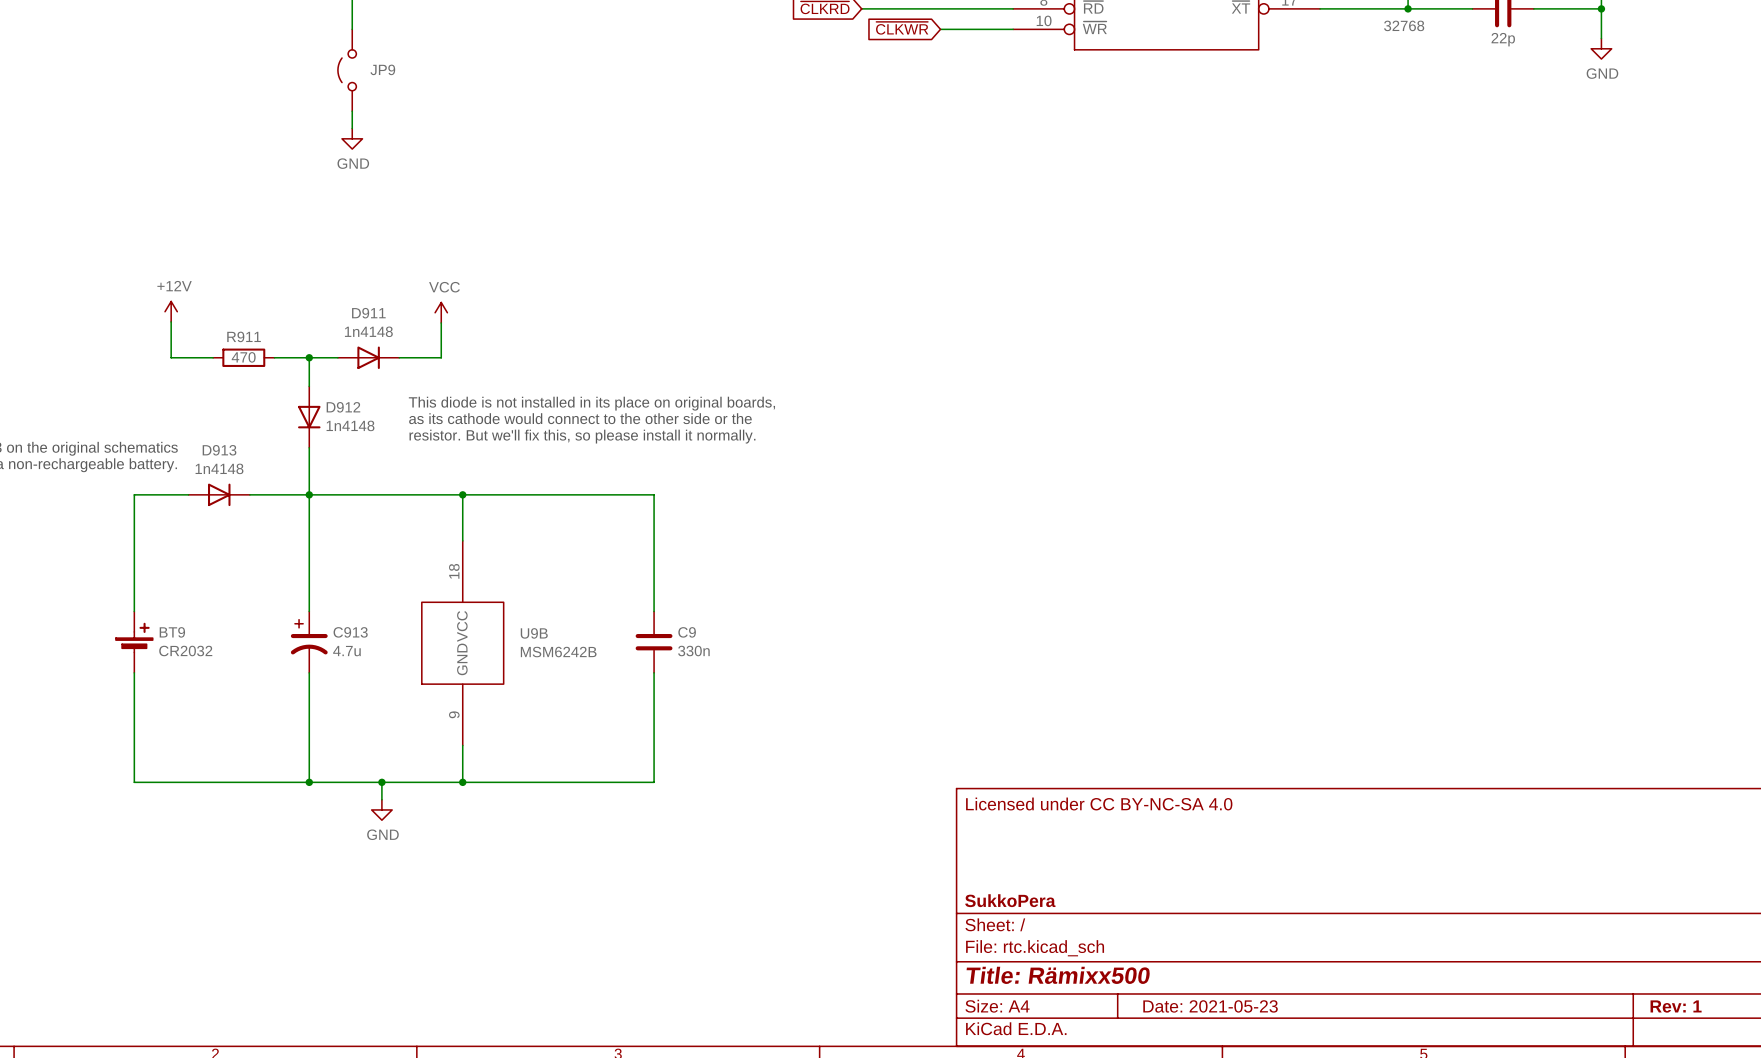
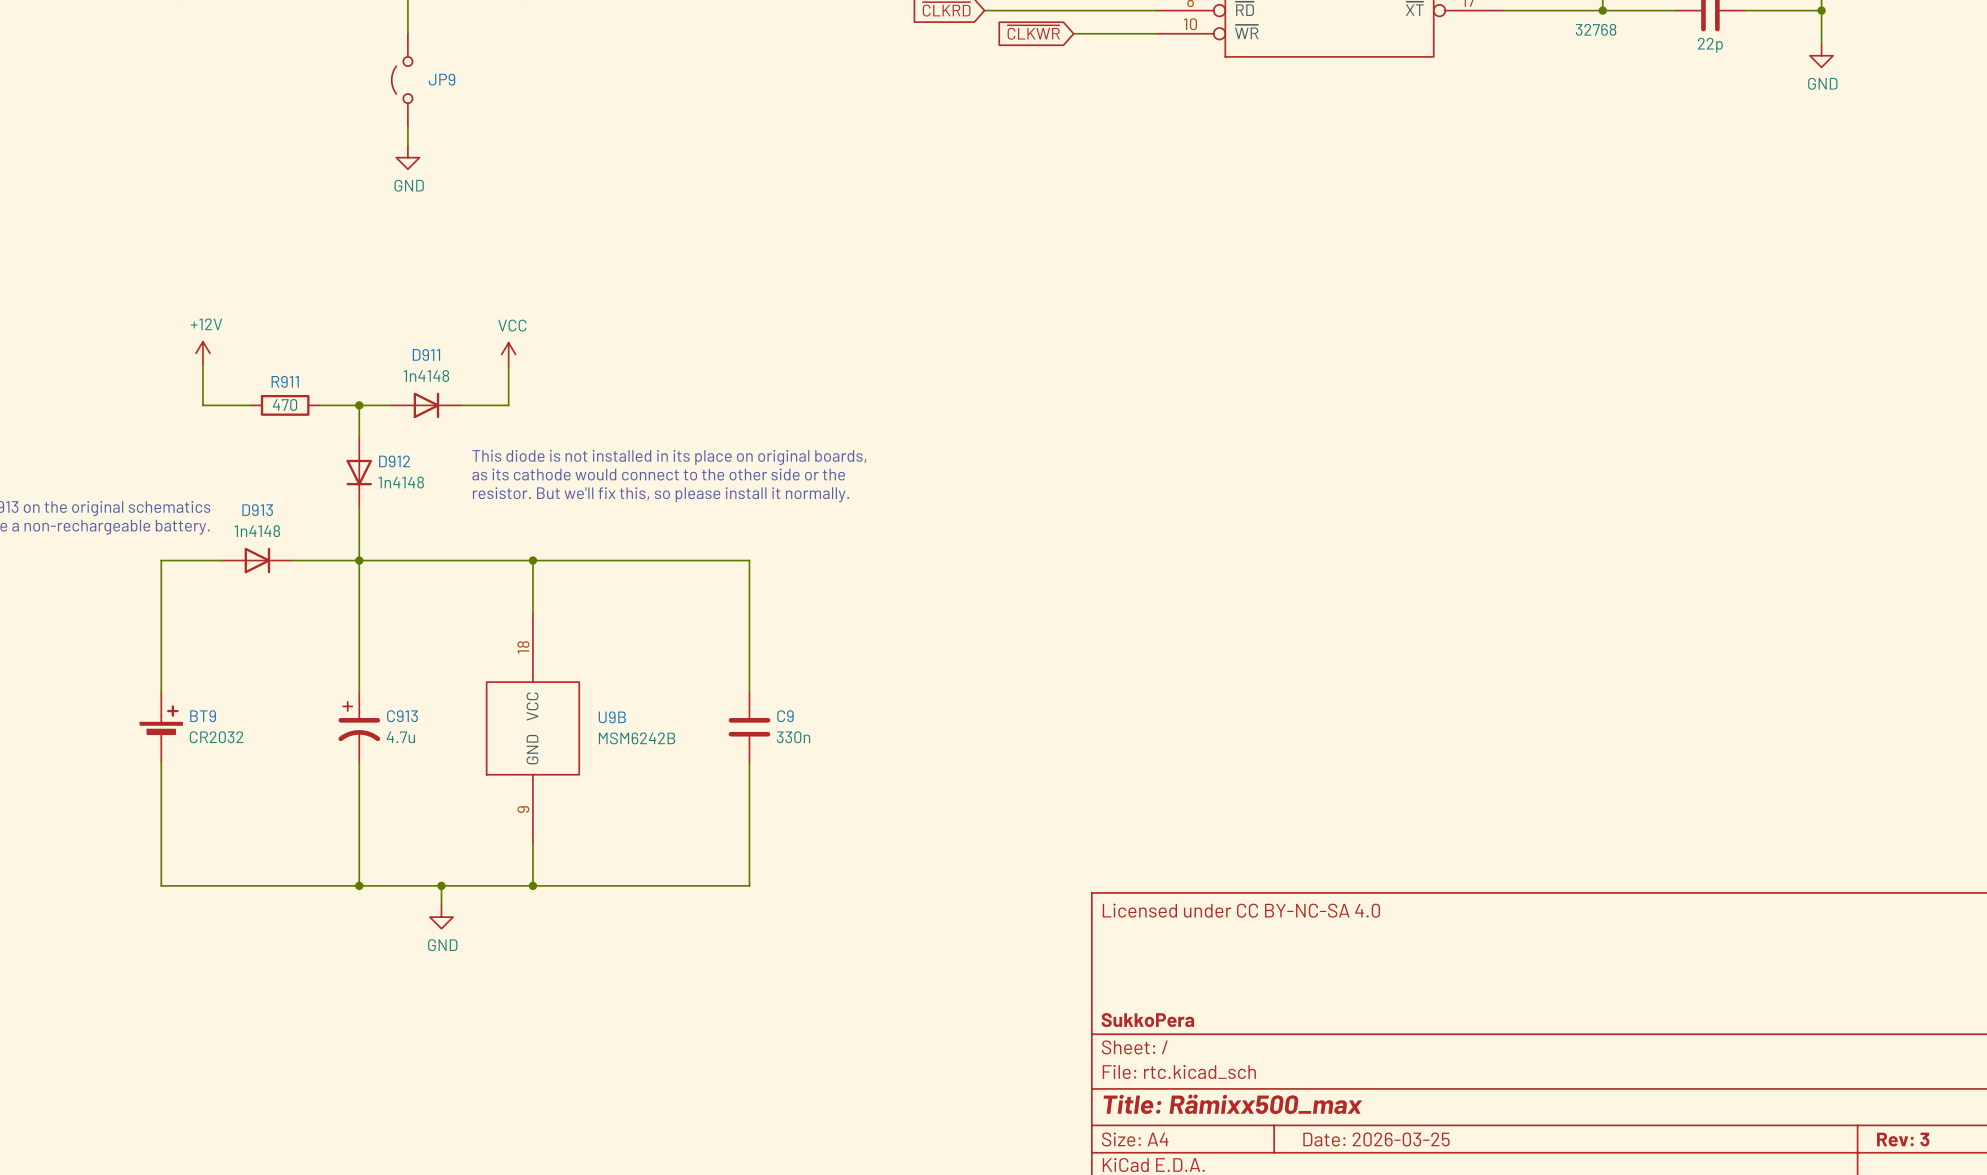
title block: Title: Rämixx500 (1058, 975) -> Title: Rämixx500_max (1232, 1104)
title block: Date: 2021-05-23 (1210, 1006) -> Date: 2026-03-25 (1376, 1139)
title block: Rev: 1 (1676, 1006) -> Rev: 3 (1903, 1139)

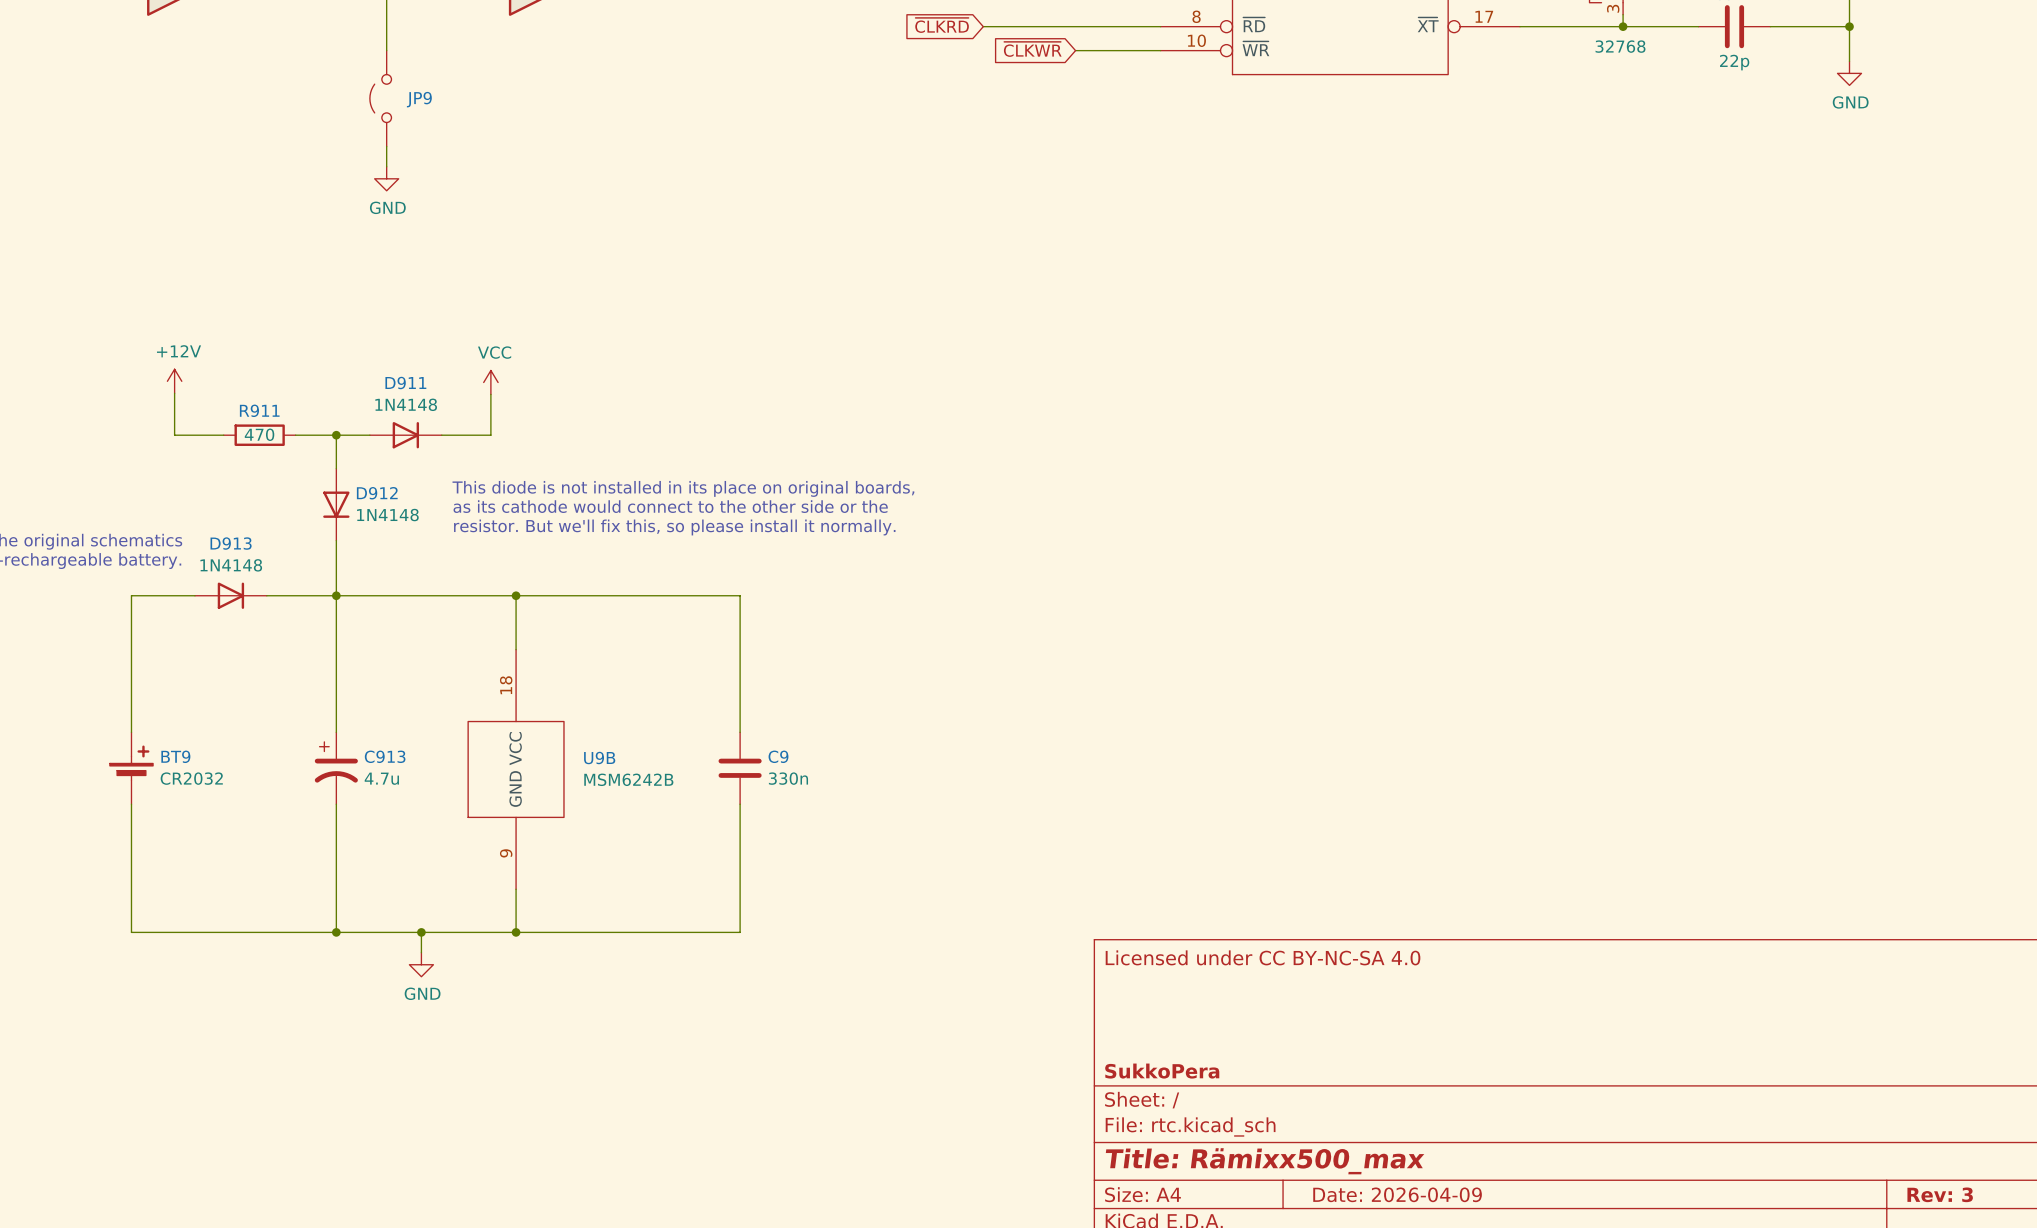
D911 value: 1n4148 (426, 376) -> 1N4148 (406, 404)
D912 value: 1n4148 (401, 482) -> 1N4148 (387, 515)
D913 value: 1n4148 (257, 531) -> 1N4148 (231, 565)
title block: Date: 2026-03-25 (1376, 1139) -> Date: 2026-04-09 (1397, 1194)

